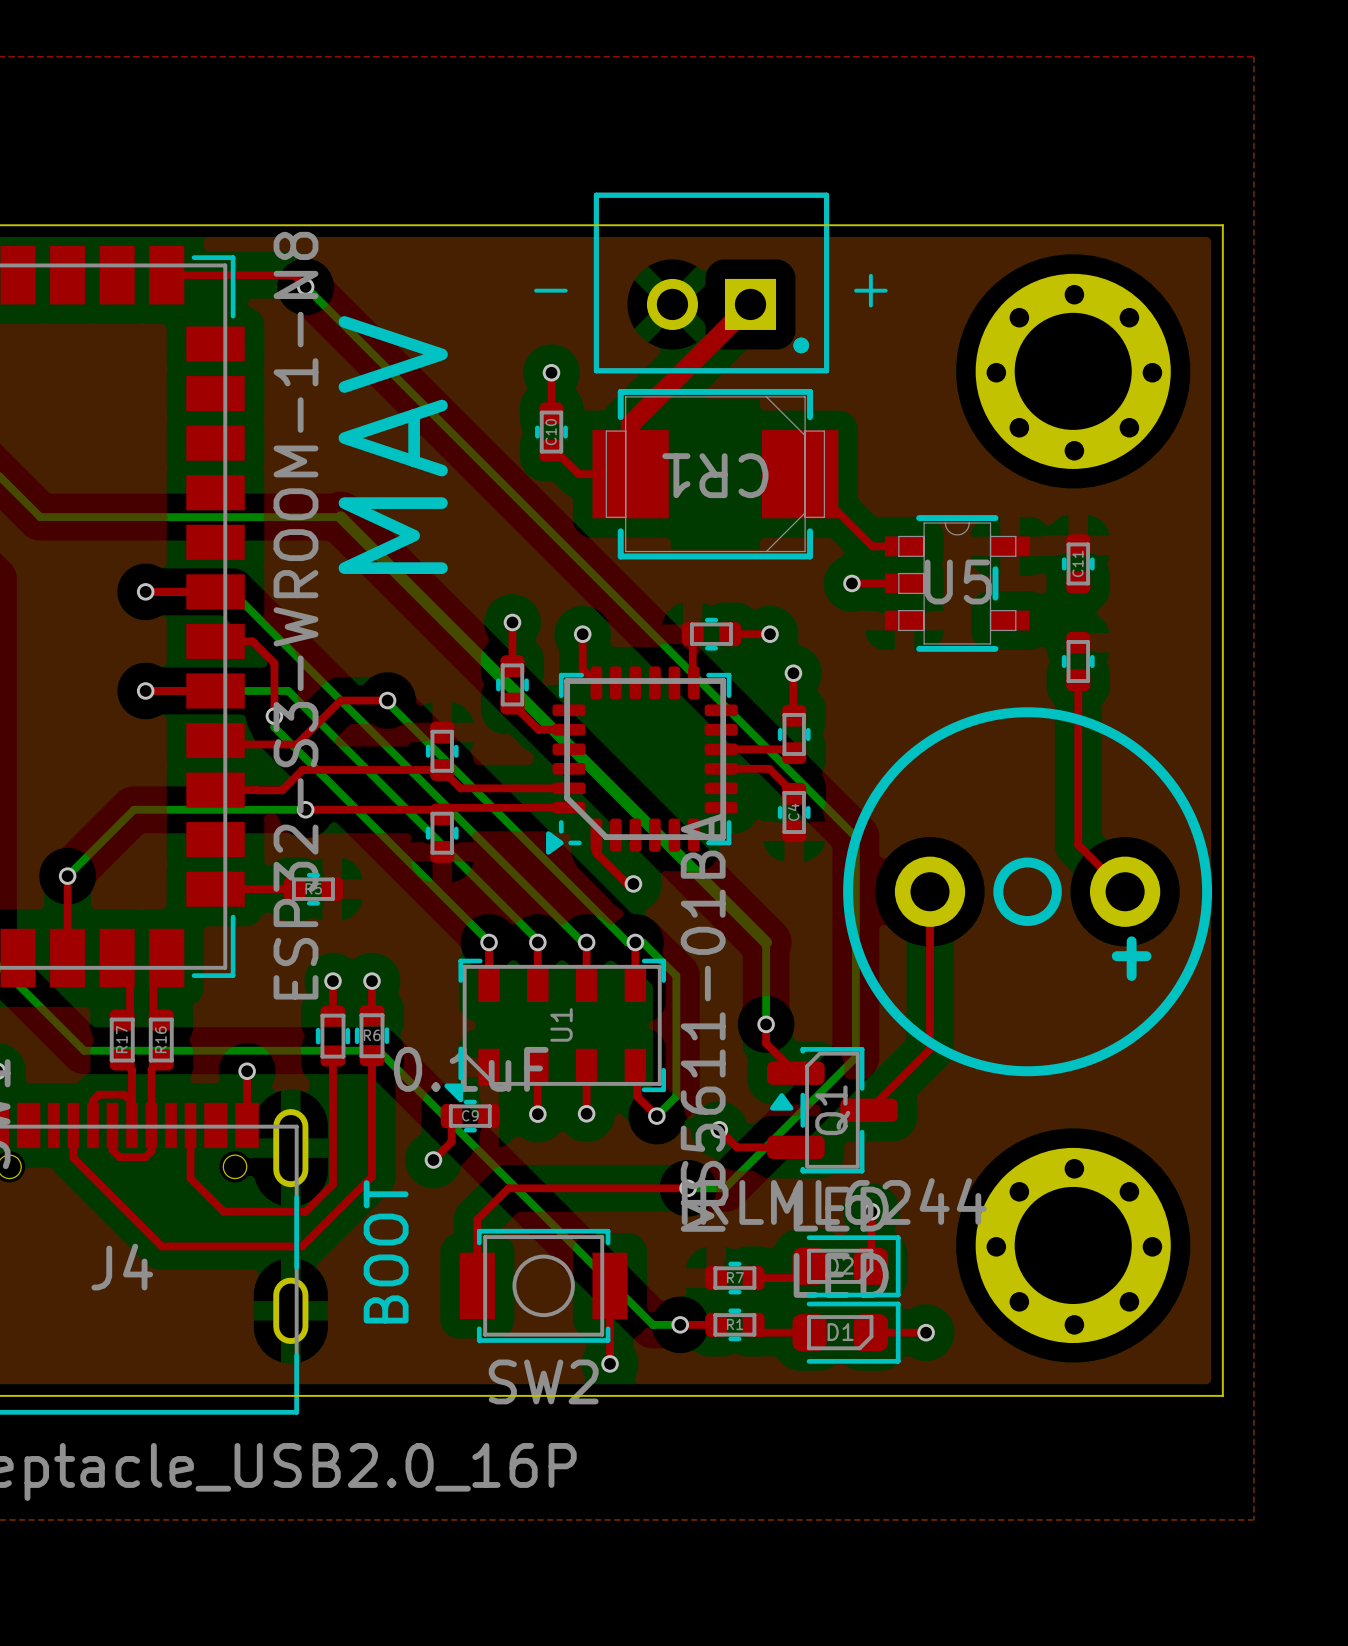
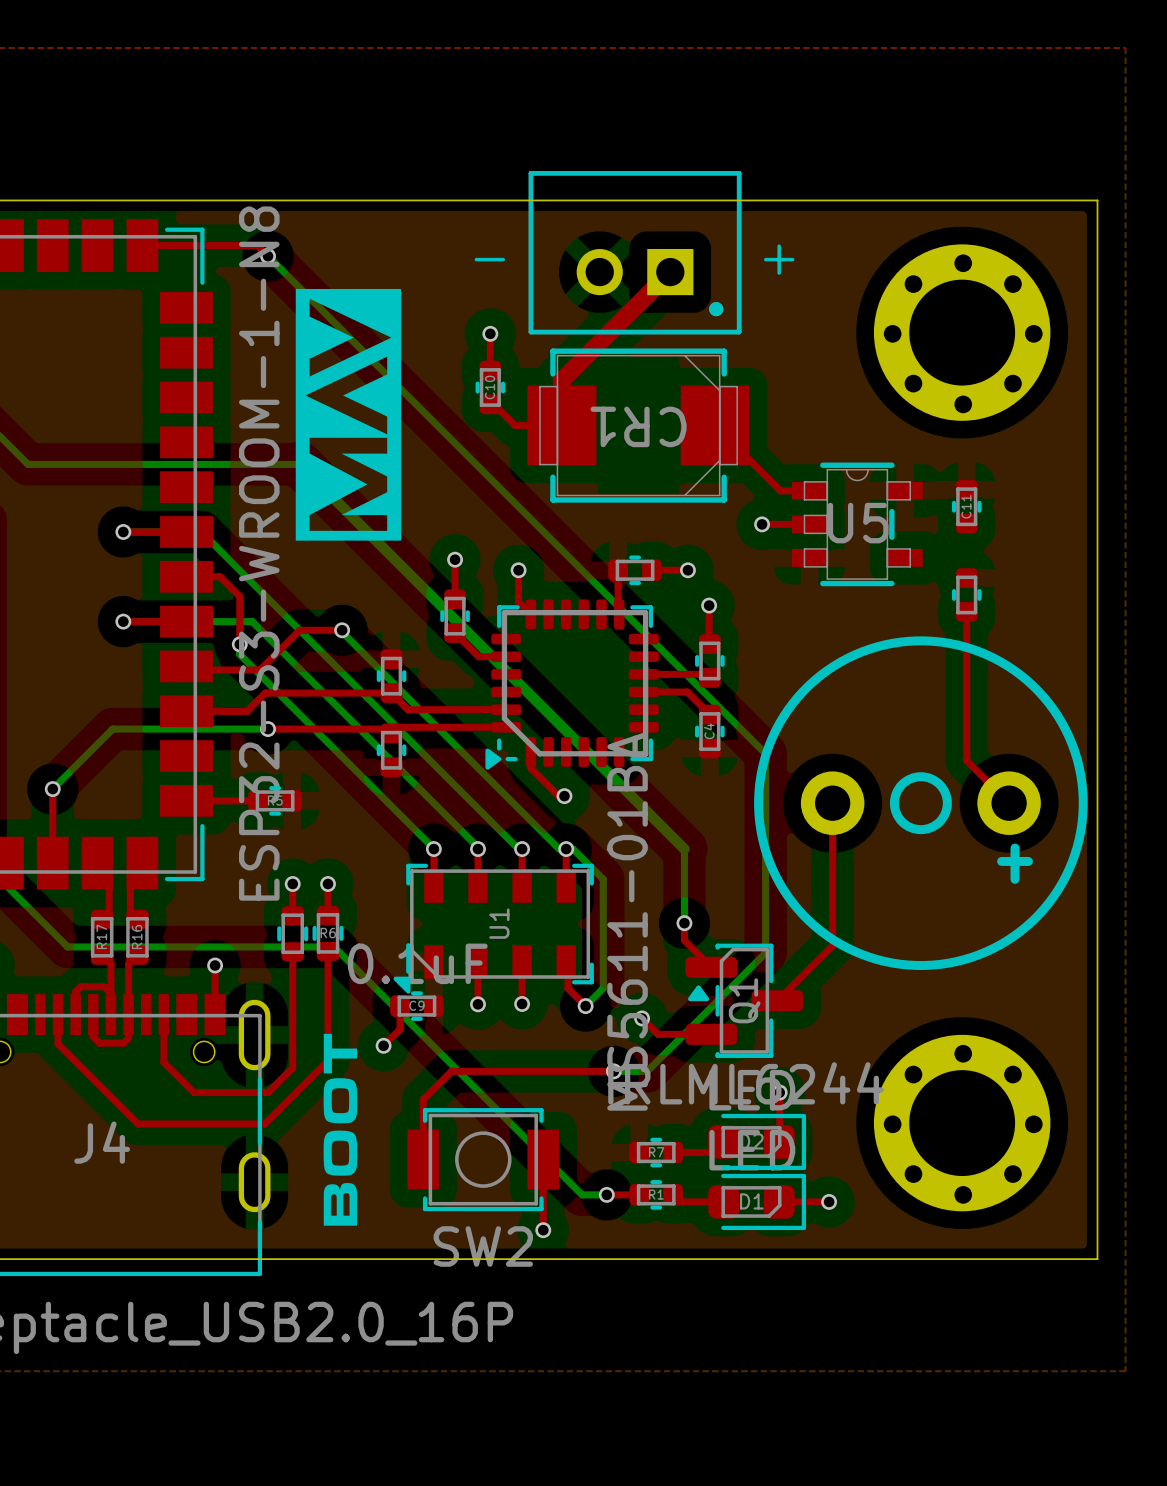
drawing: none -> [295, 288, 402, 541]
text: MAV (393, 445) -> none
drawing: none -> [323, 1033, 358, 1226]
text: BOOT (386, 1251) -> none

